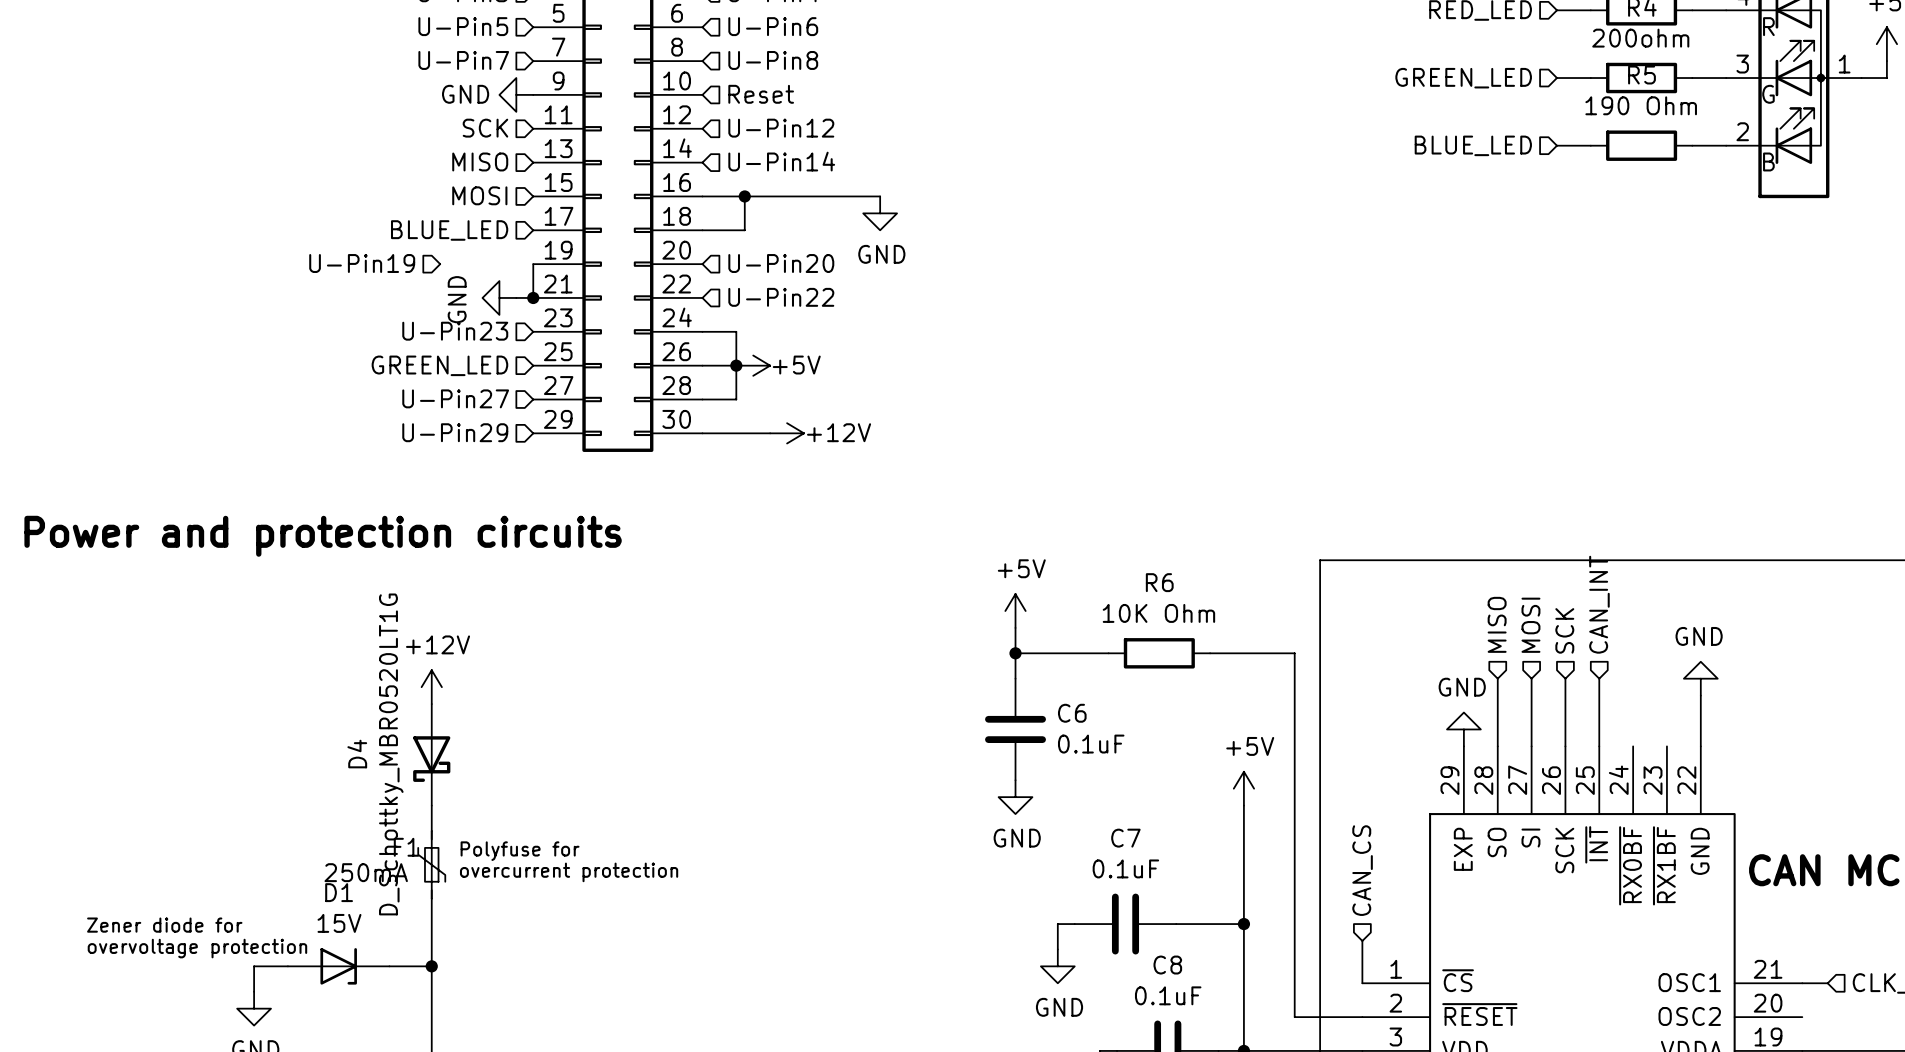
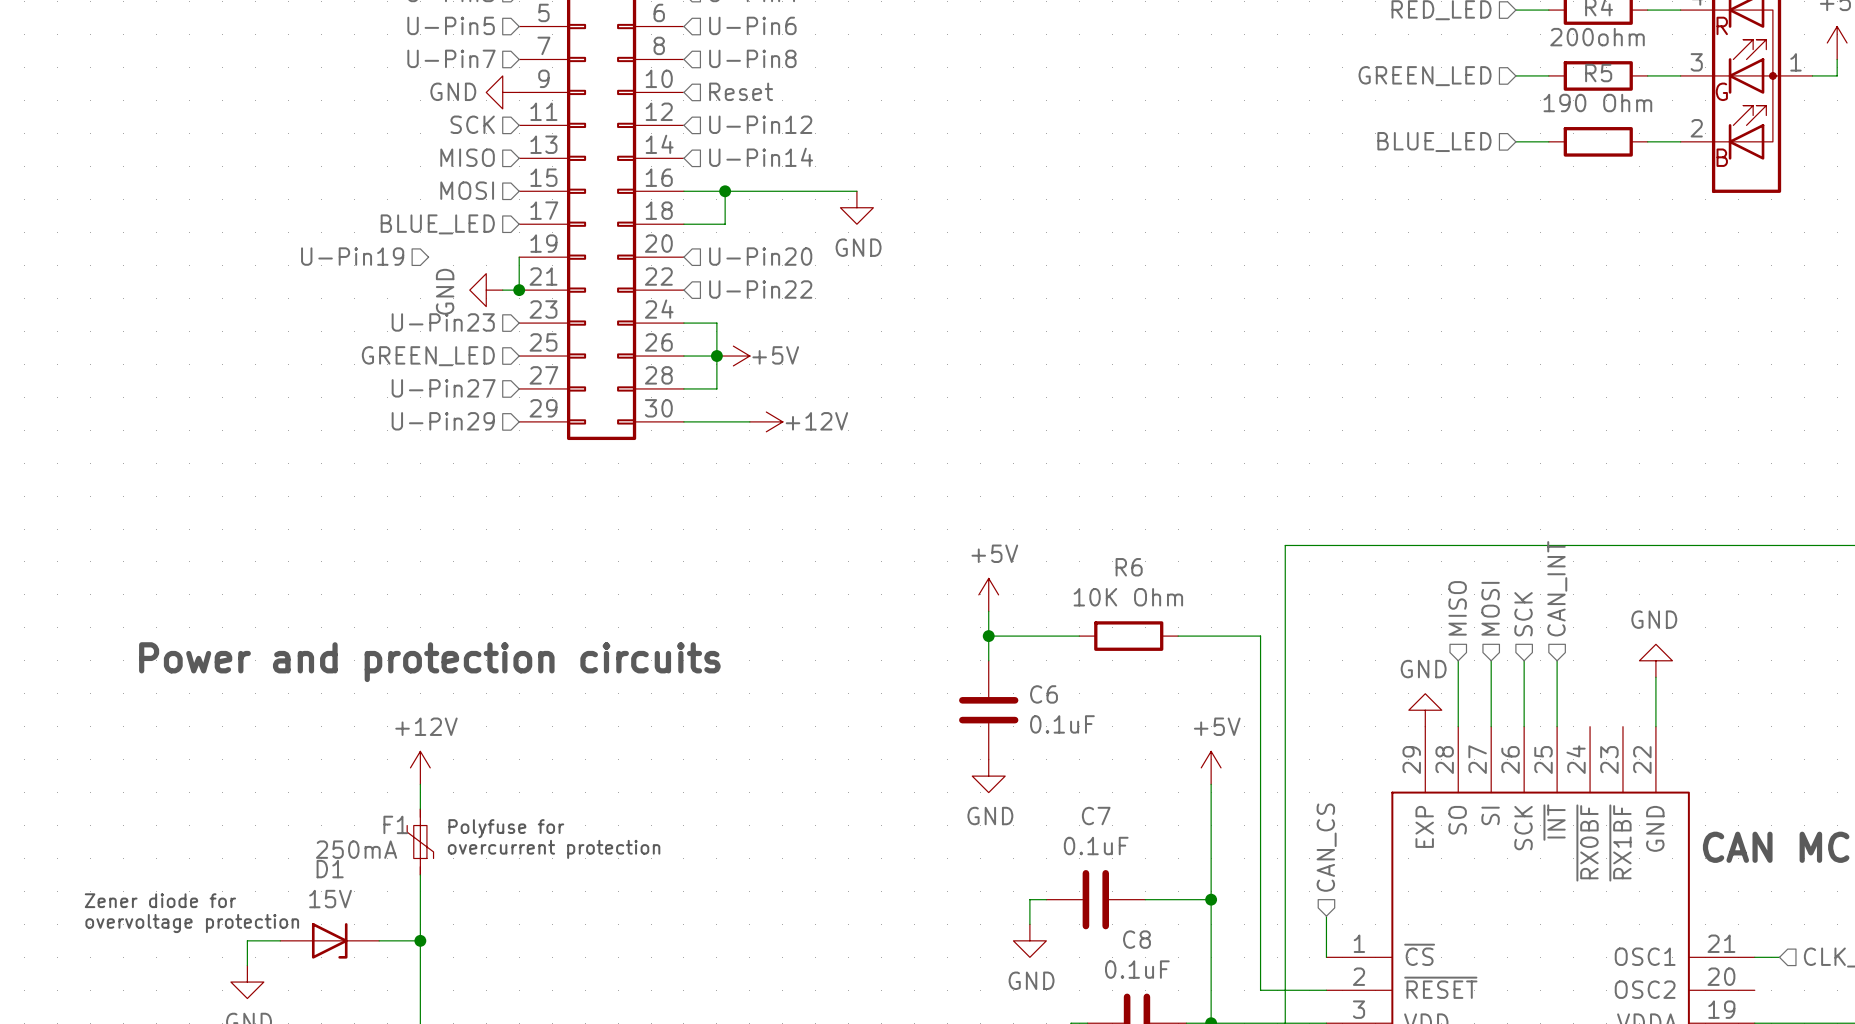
text position: Power and protection circuits (323, 536) -> Power and protection circuits (429, 662)
power symbol position: +12V (431, 687) -> +12V (420, 767)
D4: D_Schottky_MBR0520LT1G (431, 754) -> none

